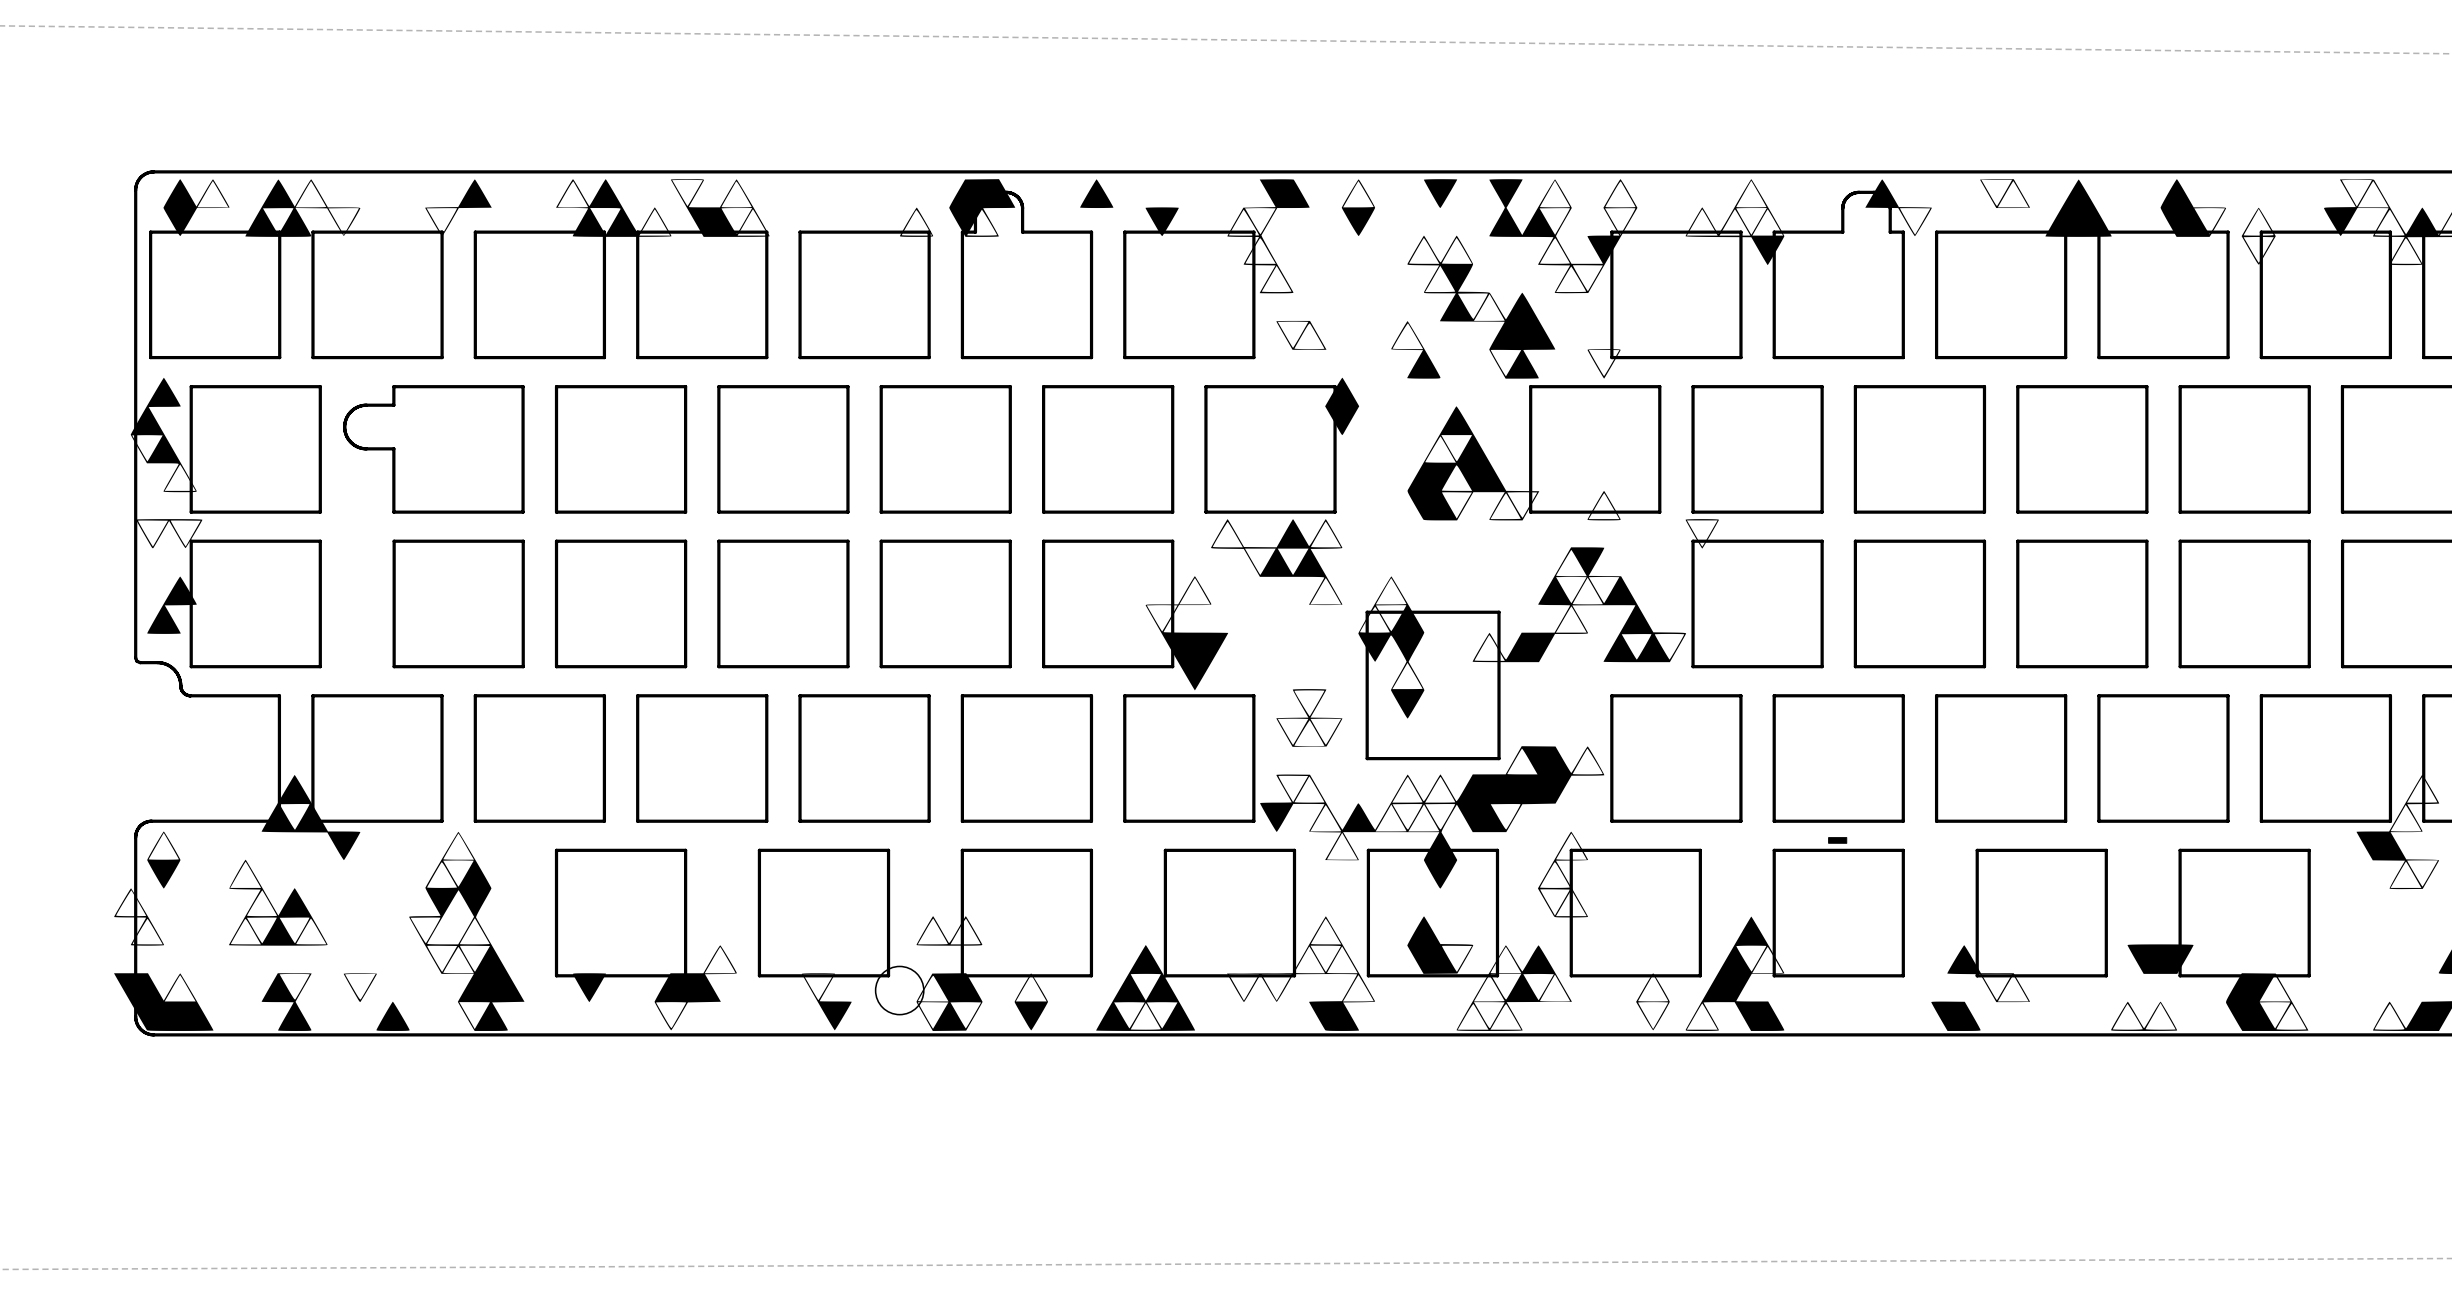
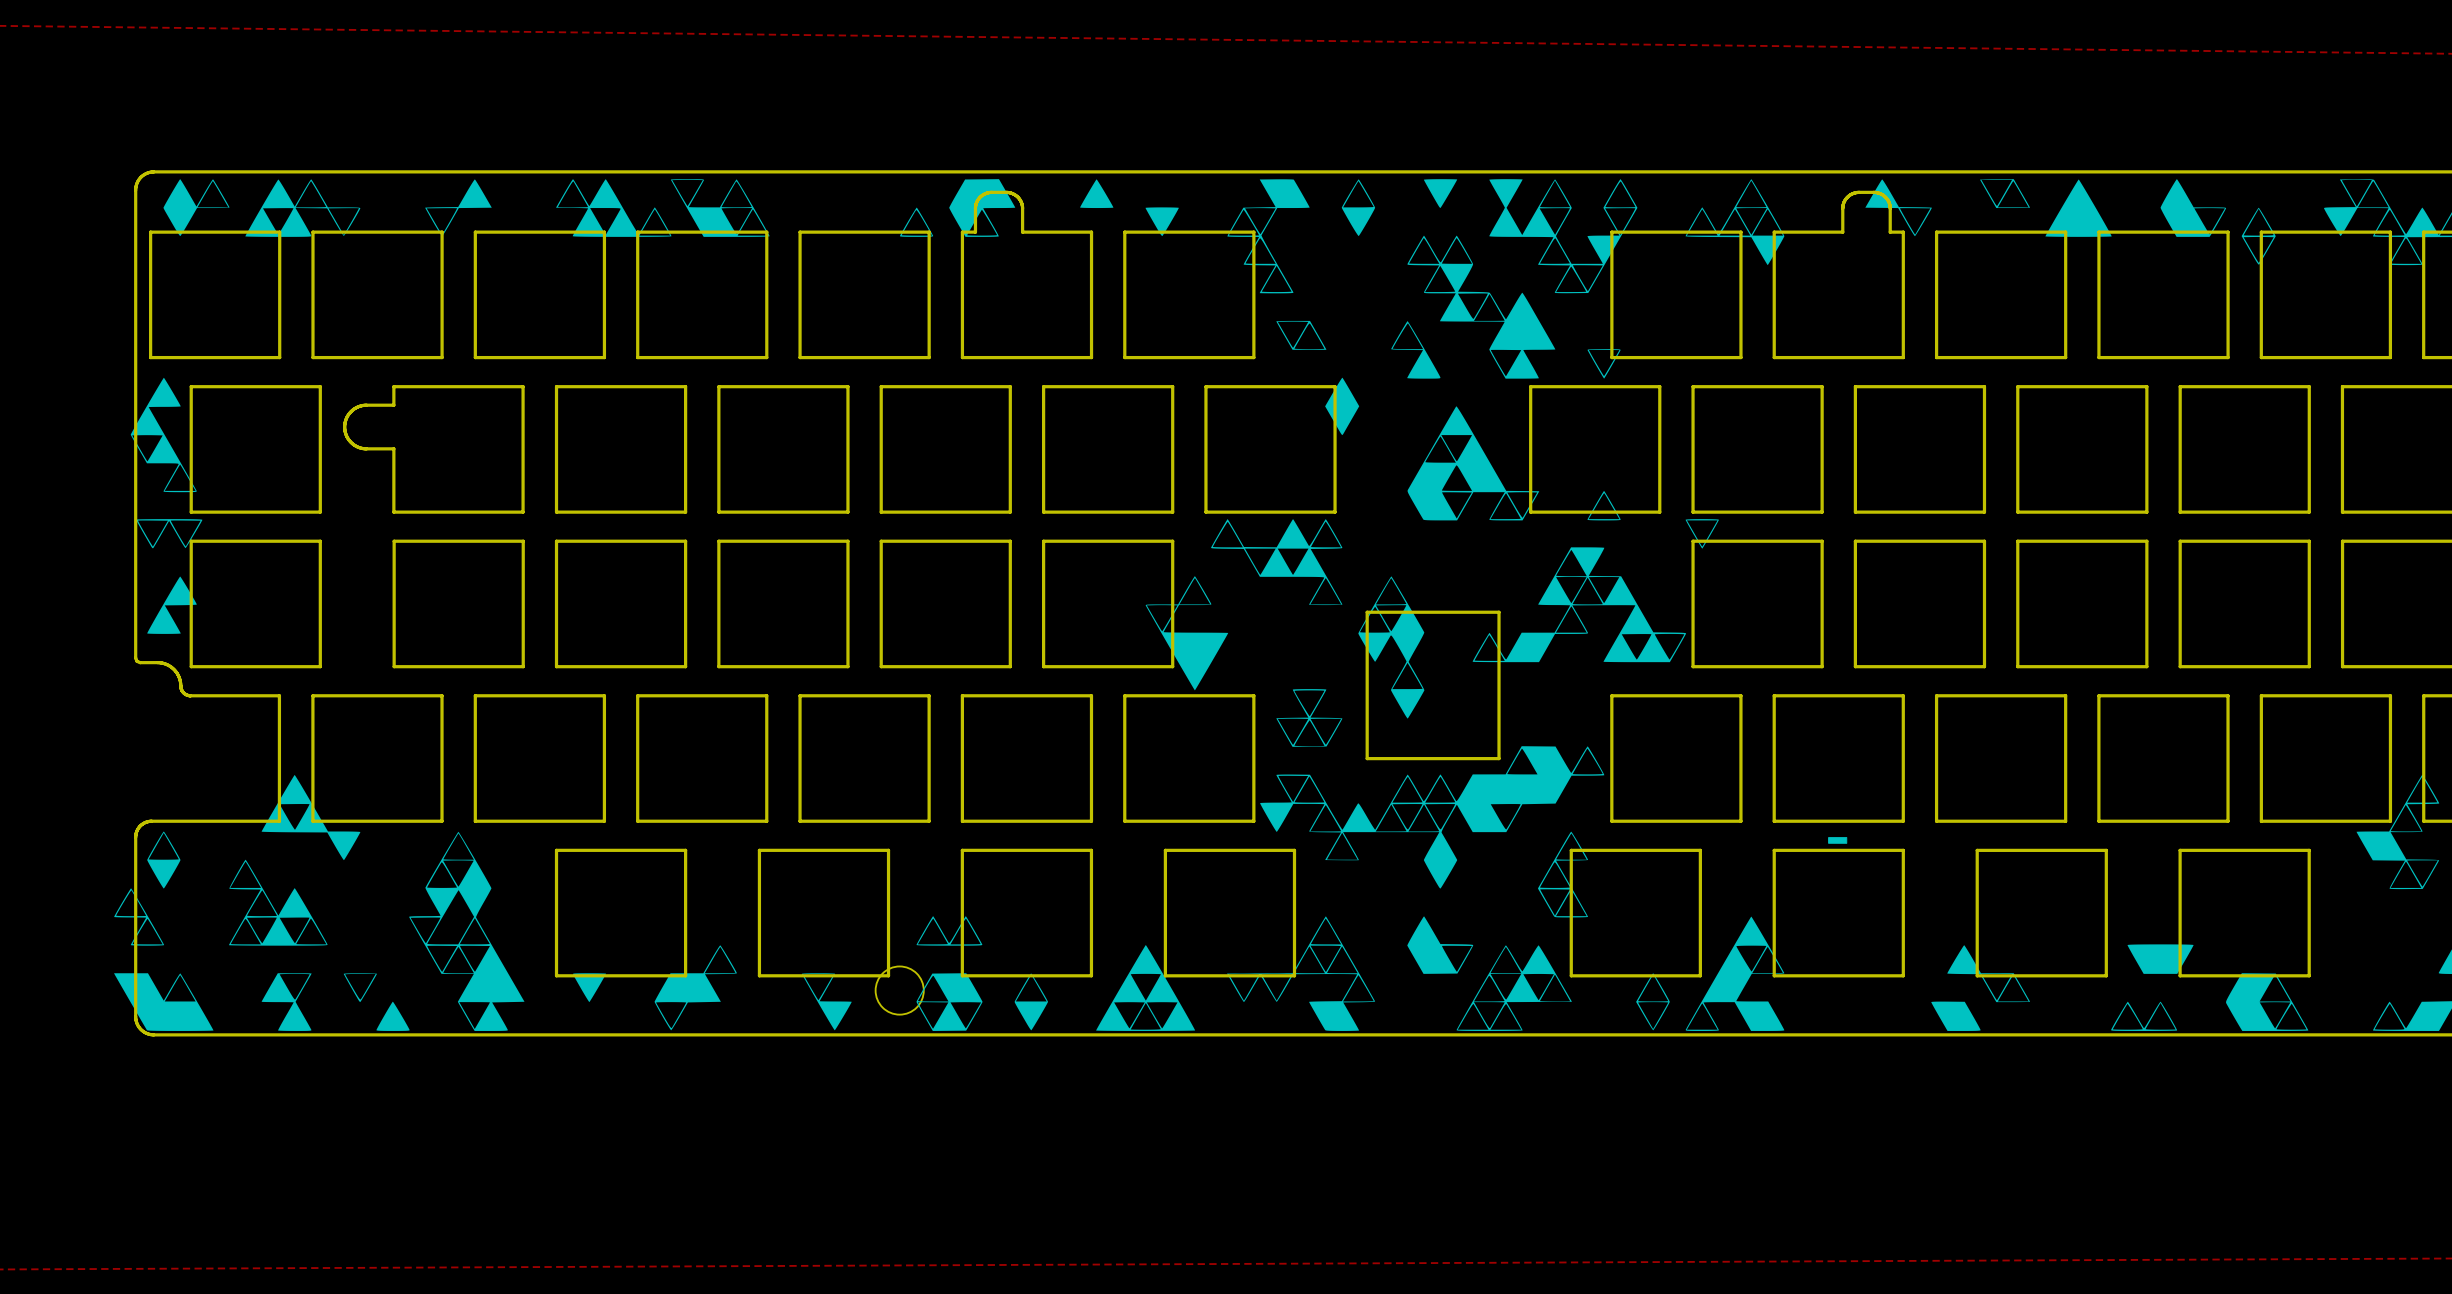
board edge: (1368, 850) (1368, 975) (1497, 975) (1497, 850) (1368, 850) -> none

